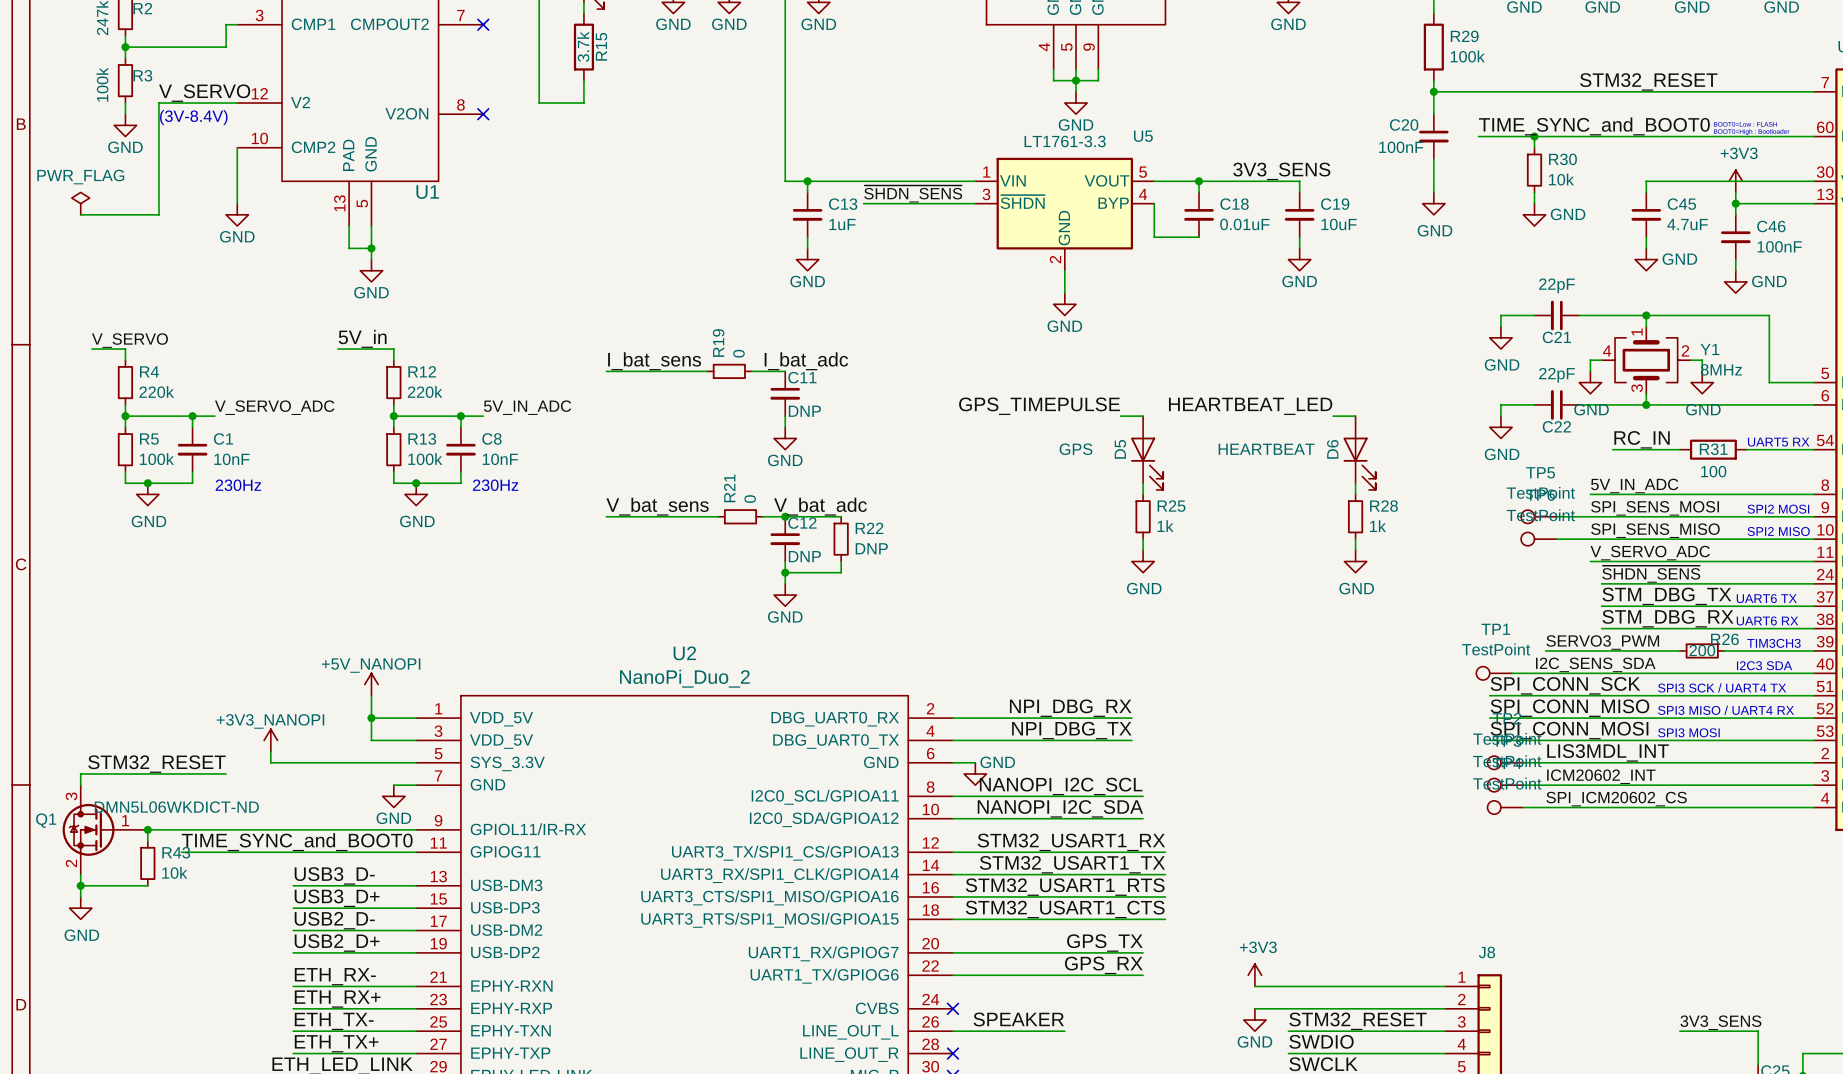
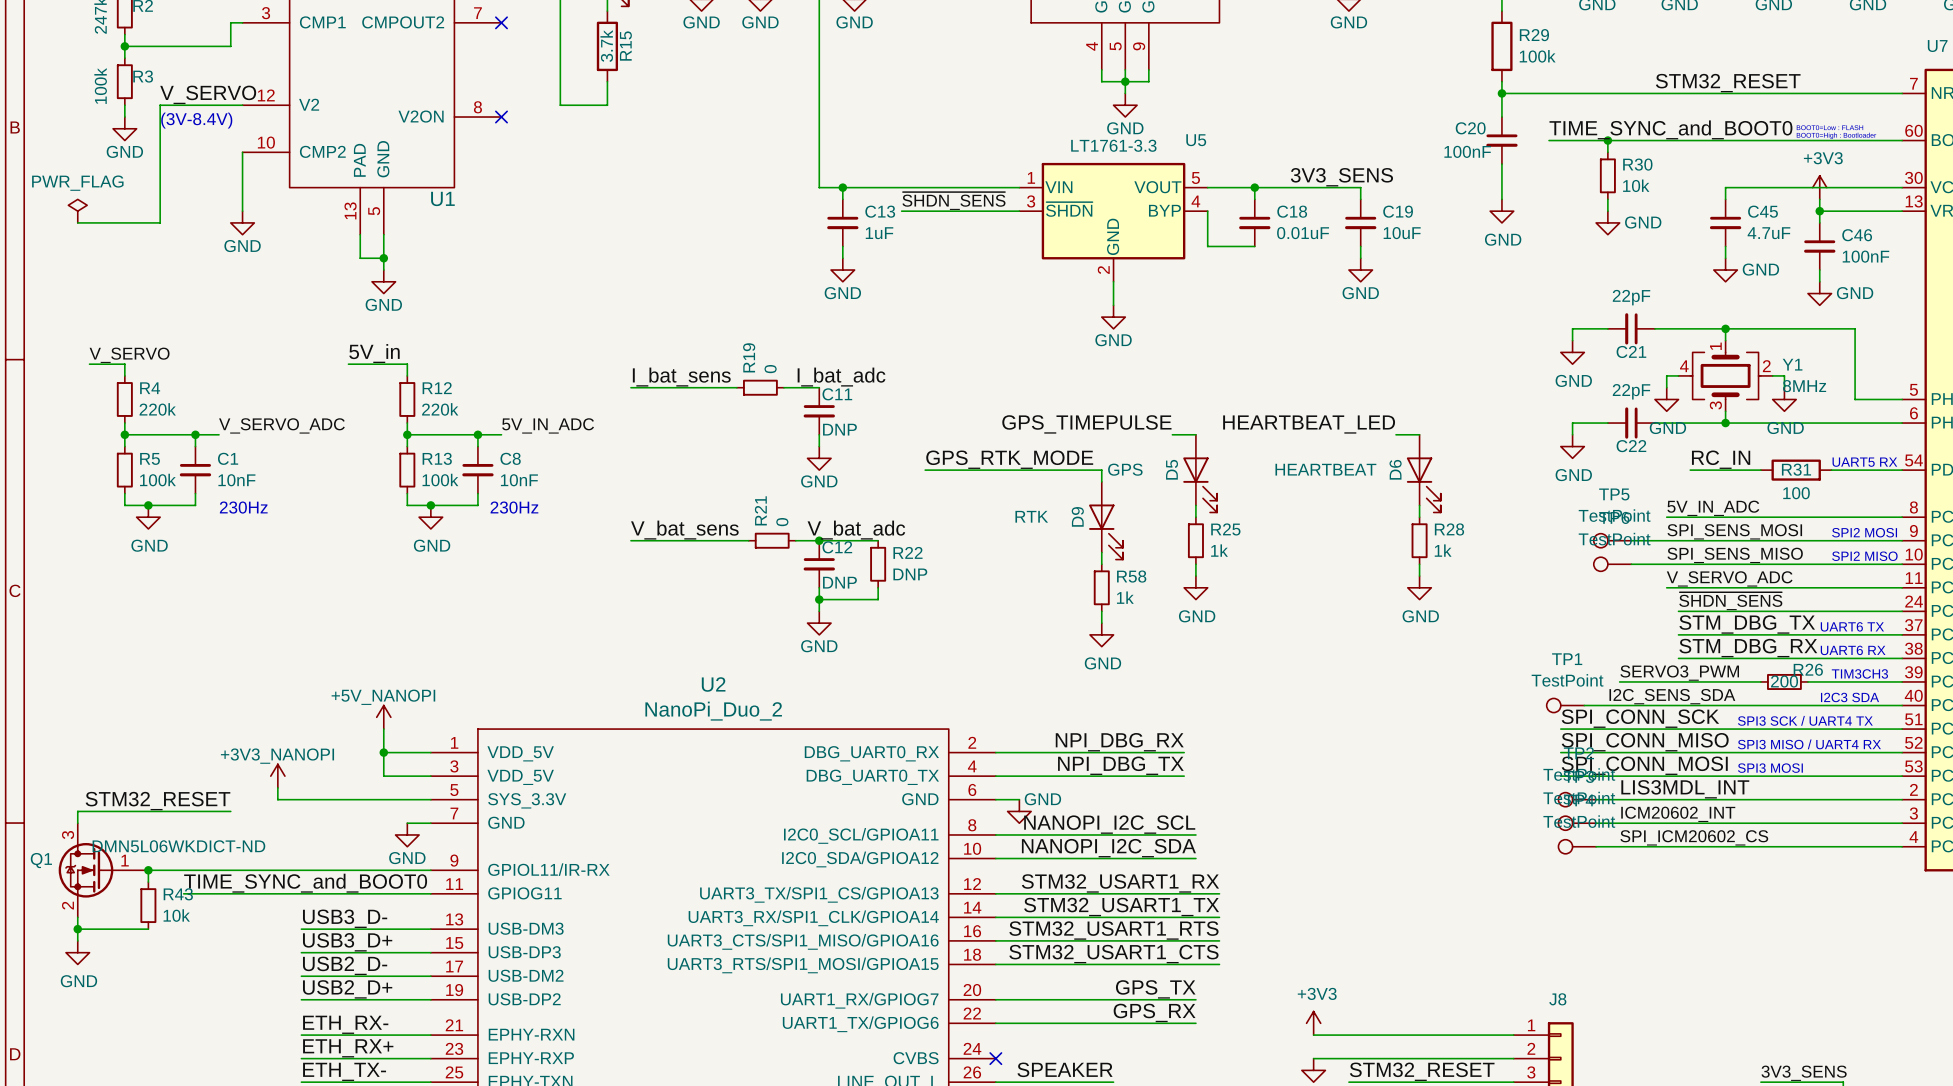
label: none -> GPS_RTK_MODE (1009, 459)
wire: none -> (925, 470) (1101, 470) (1101, 481)
D9: none -> RTK (1106, 520)
wire: none -> (1101, 552) (1101, 564)
R58: none -> 1k (1101, 587)
wire: none -> (1101, 611) (1101, 623)
power symbol: none -> GND (1101, 634)

